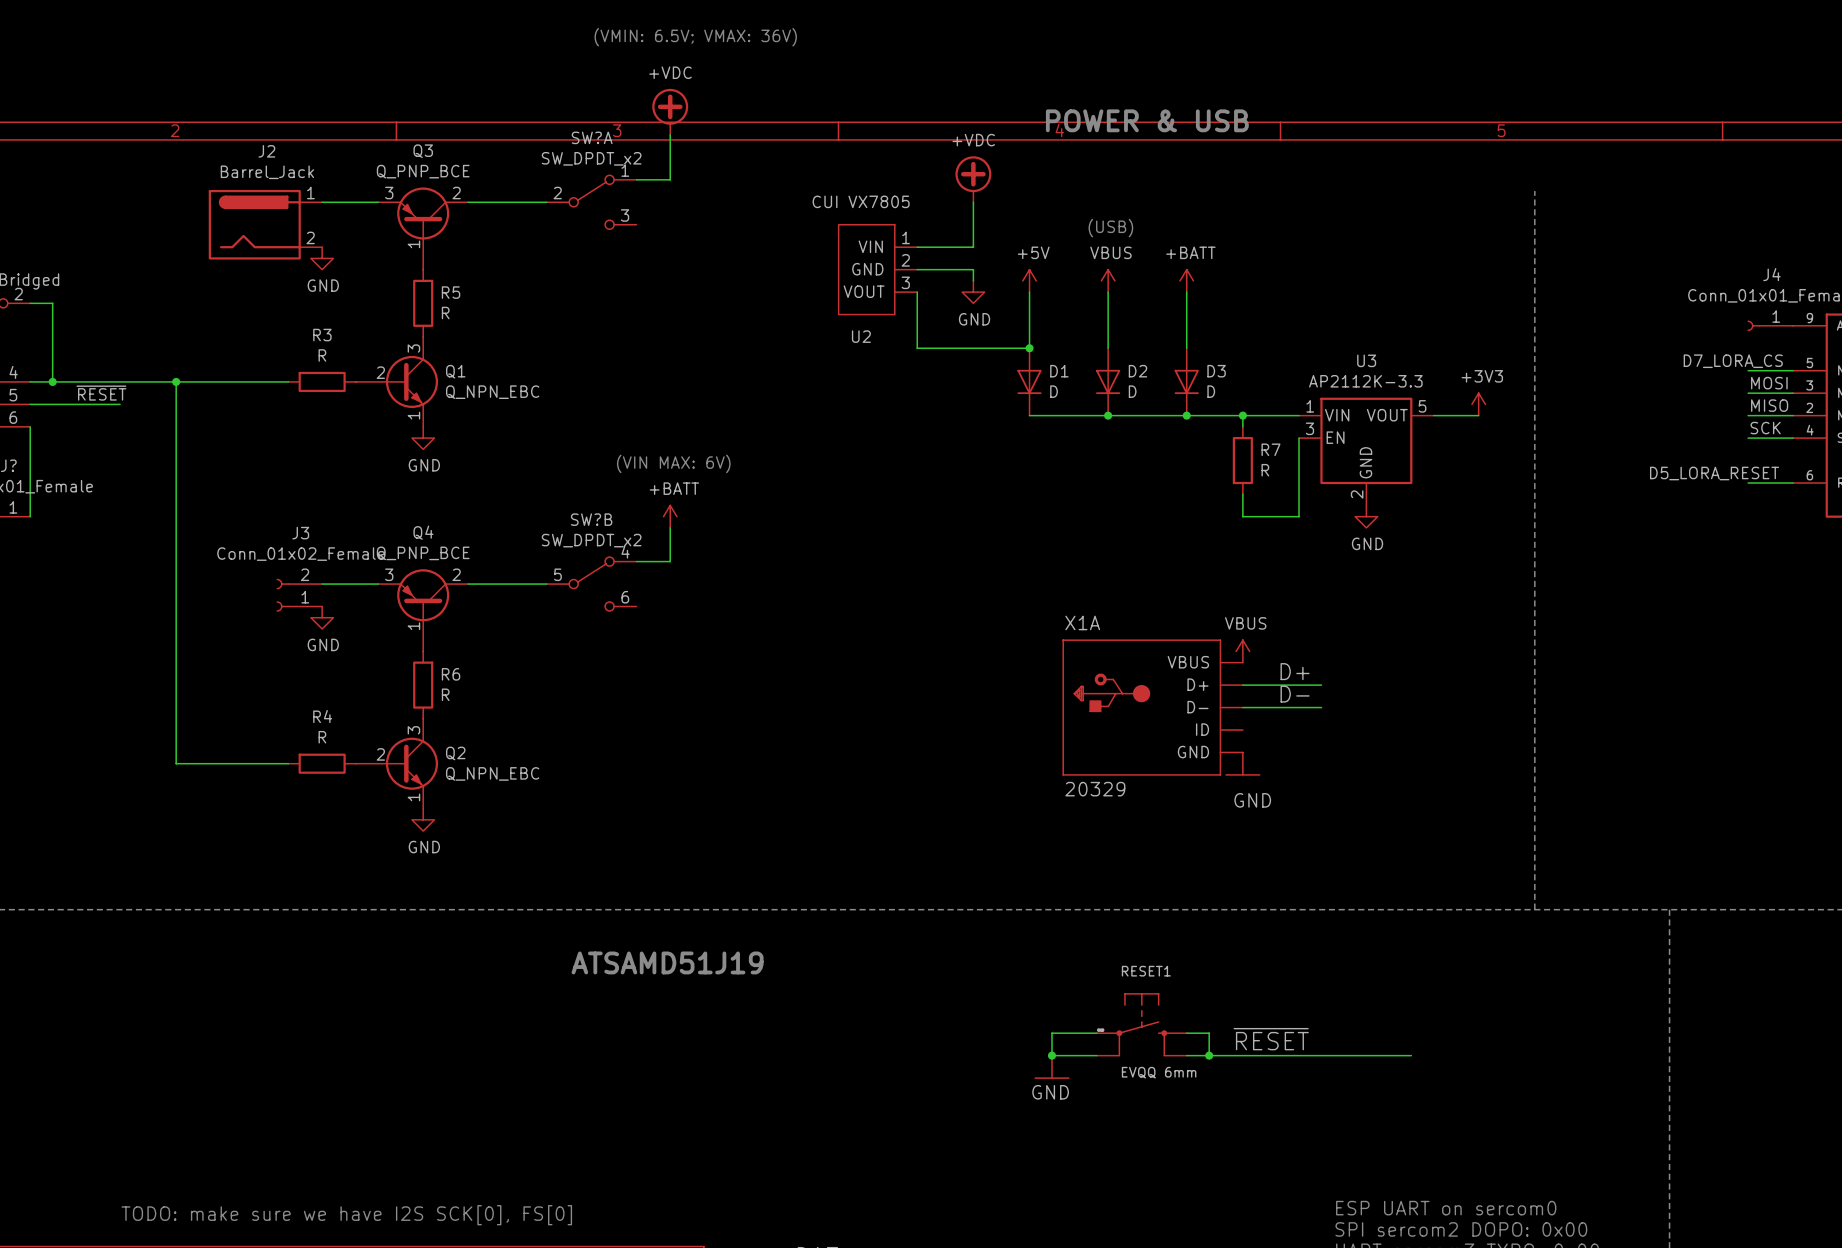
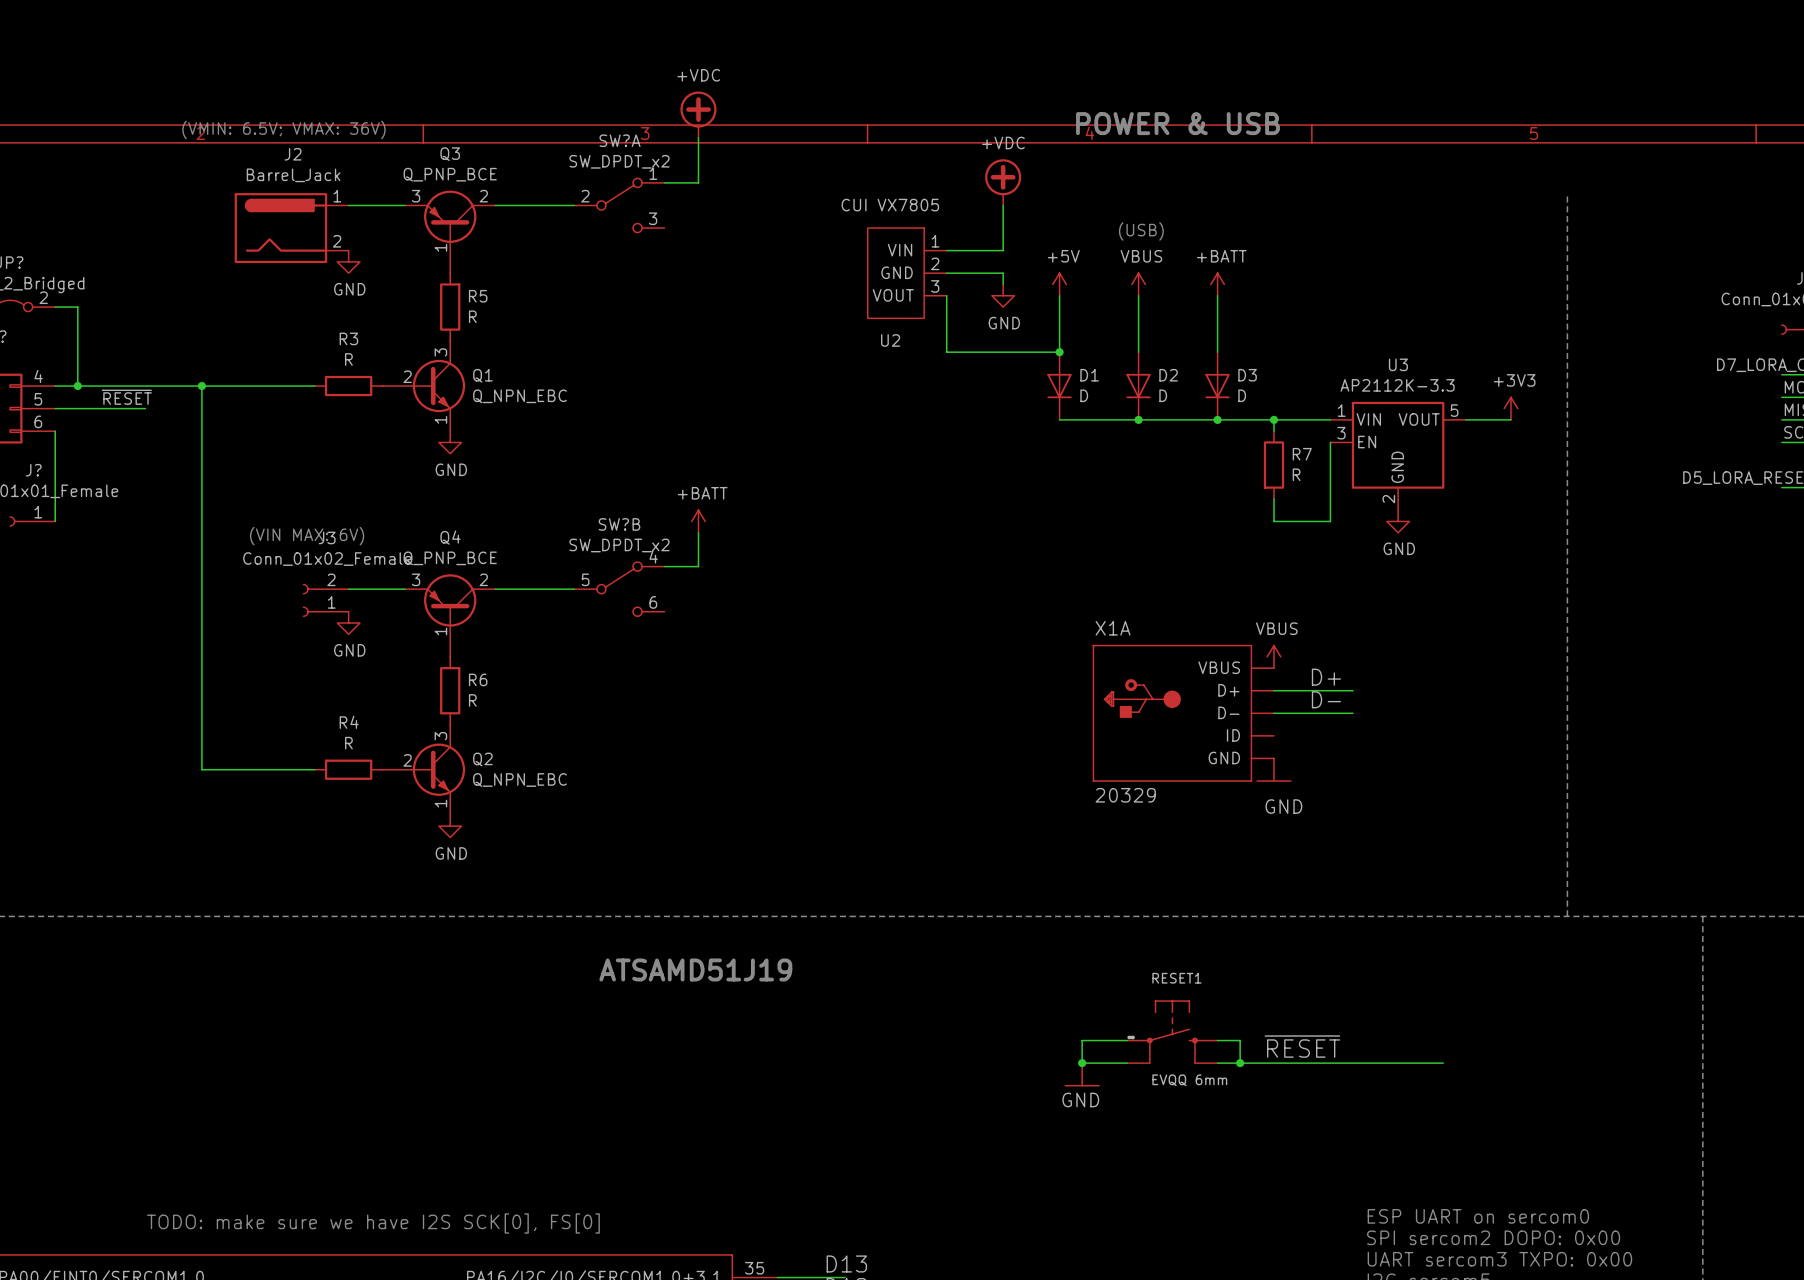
text: (VMIN: 6.5V; VMAX: 36V) (695, 37) -> none
text: none -> (VMIN: 6.5V; VMAX: 36V) (283, 129)
text: (VIN MAX: 6V) (673, 463) -> none
text: none -> (VIN MAX: 6V) (307, 536)

